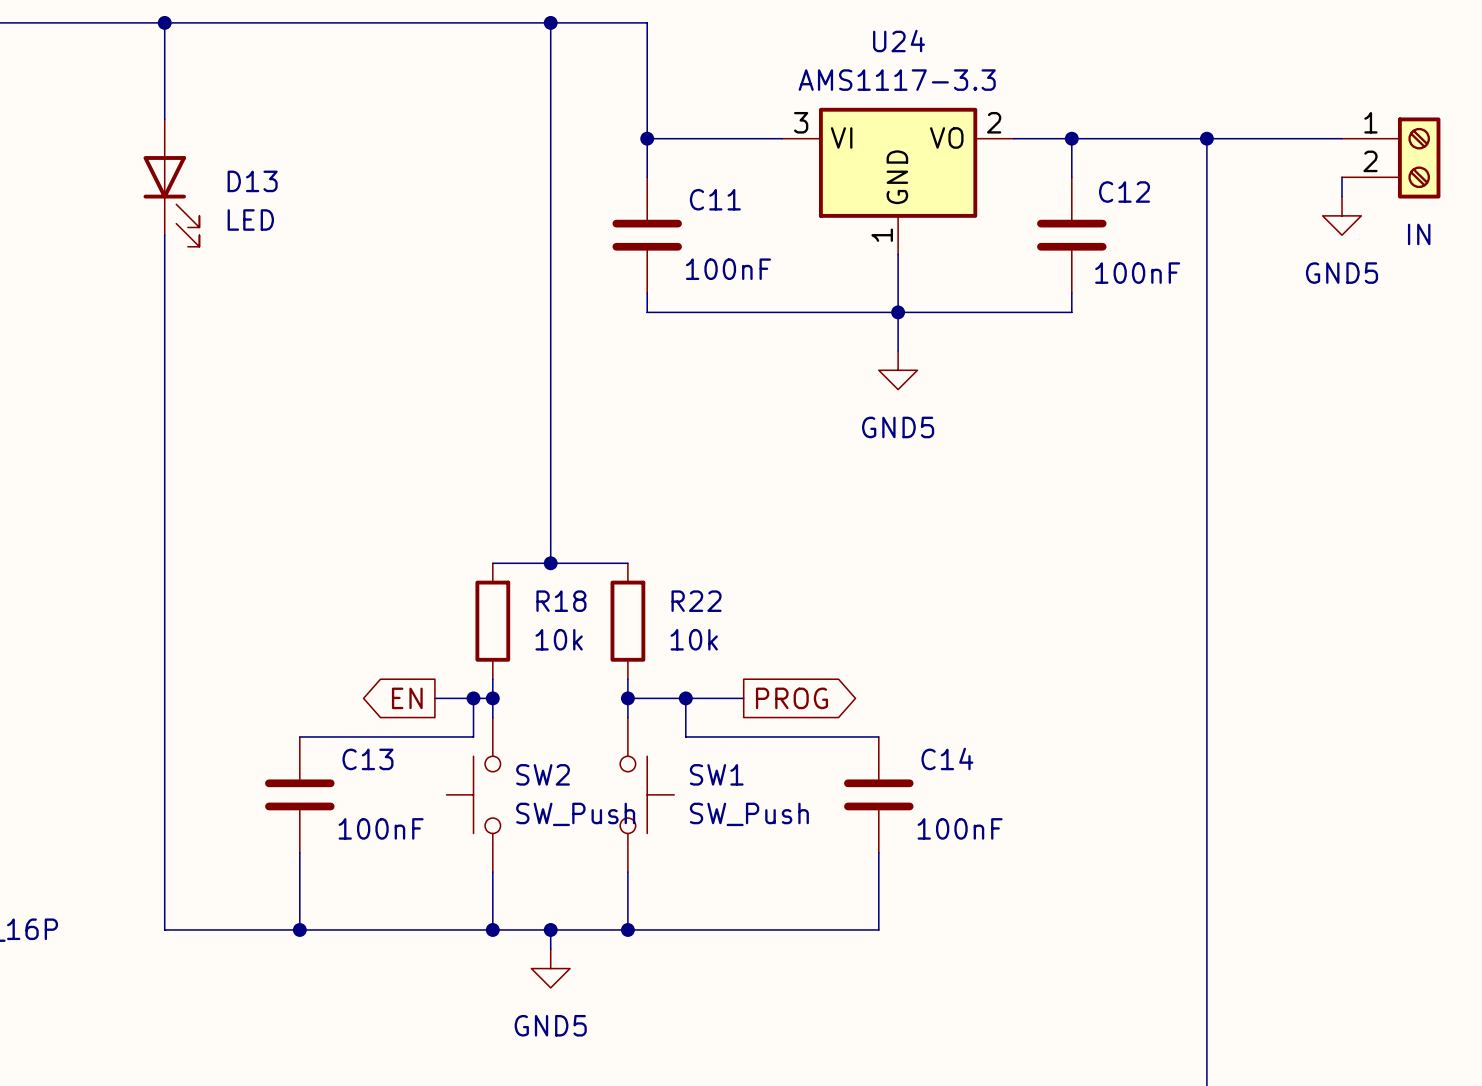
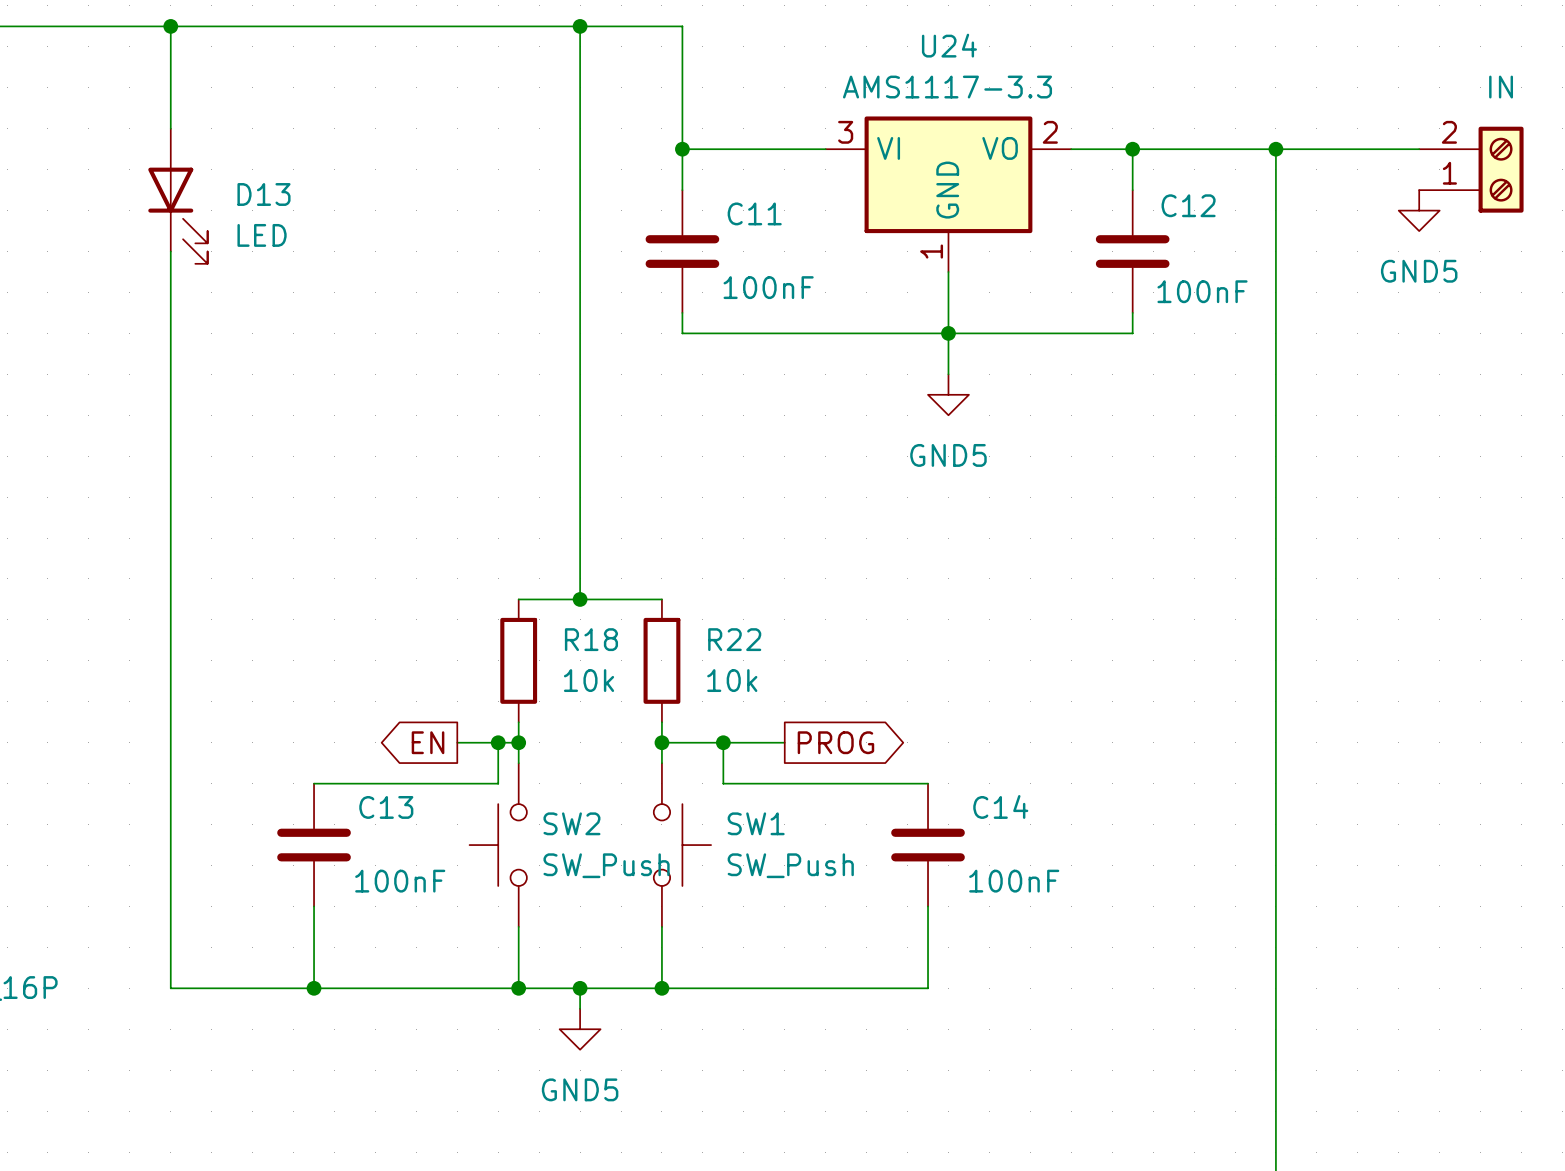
part flip: as is (1419, 157) -> up-down (1501, 169)
power symbol position: GND5 (1342, 215) -> GND5 (1419, 210)

